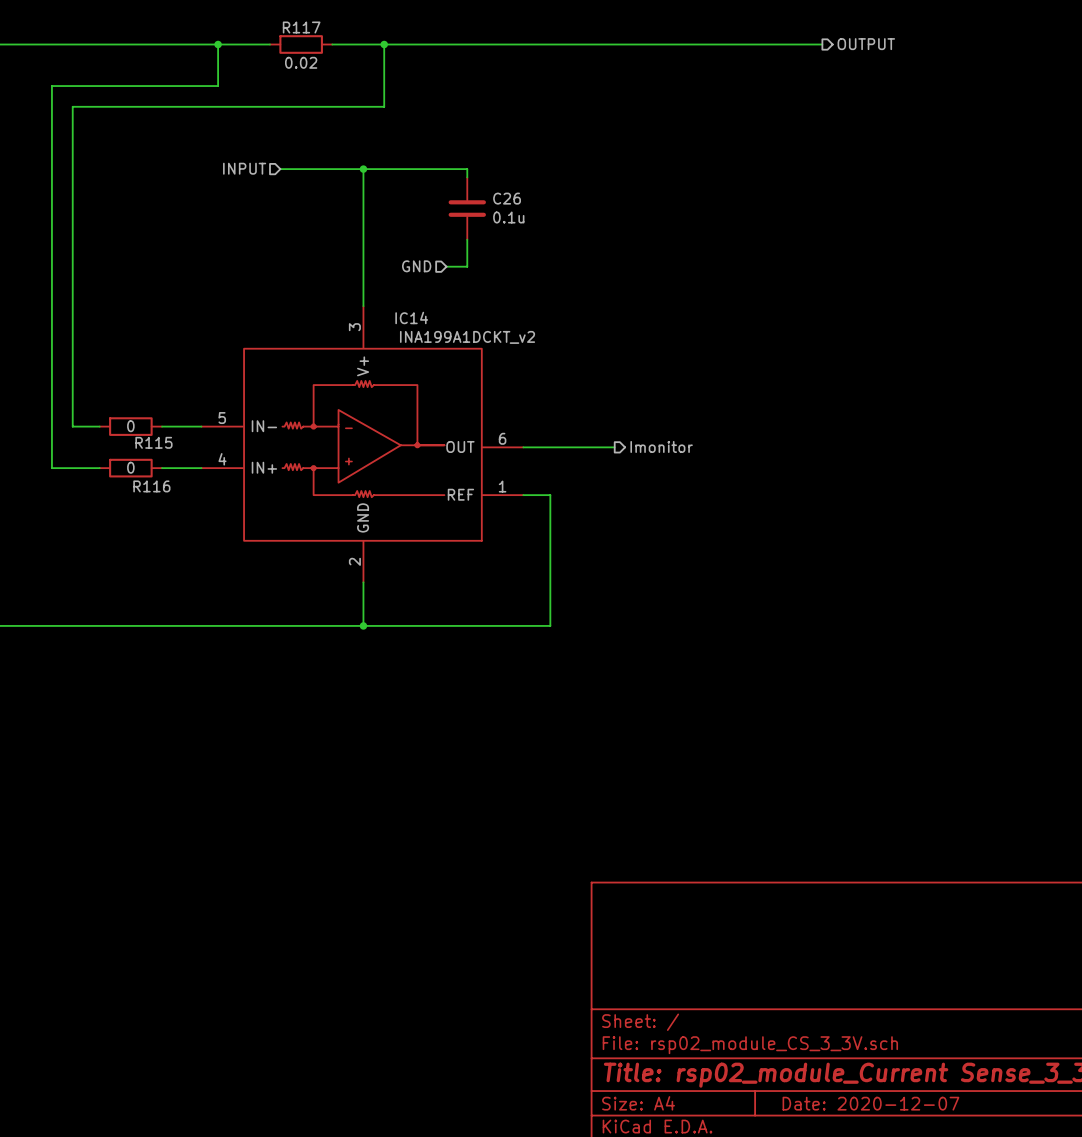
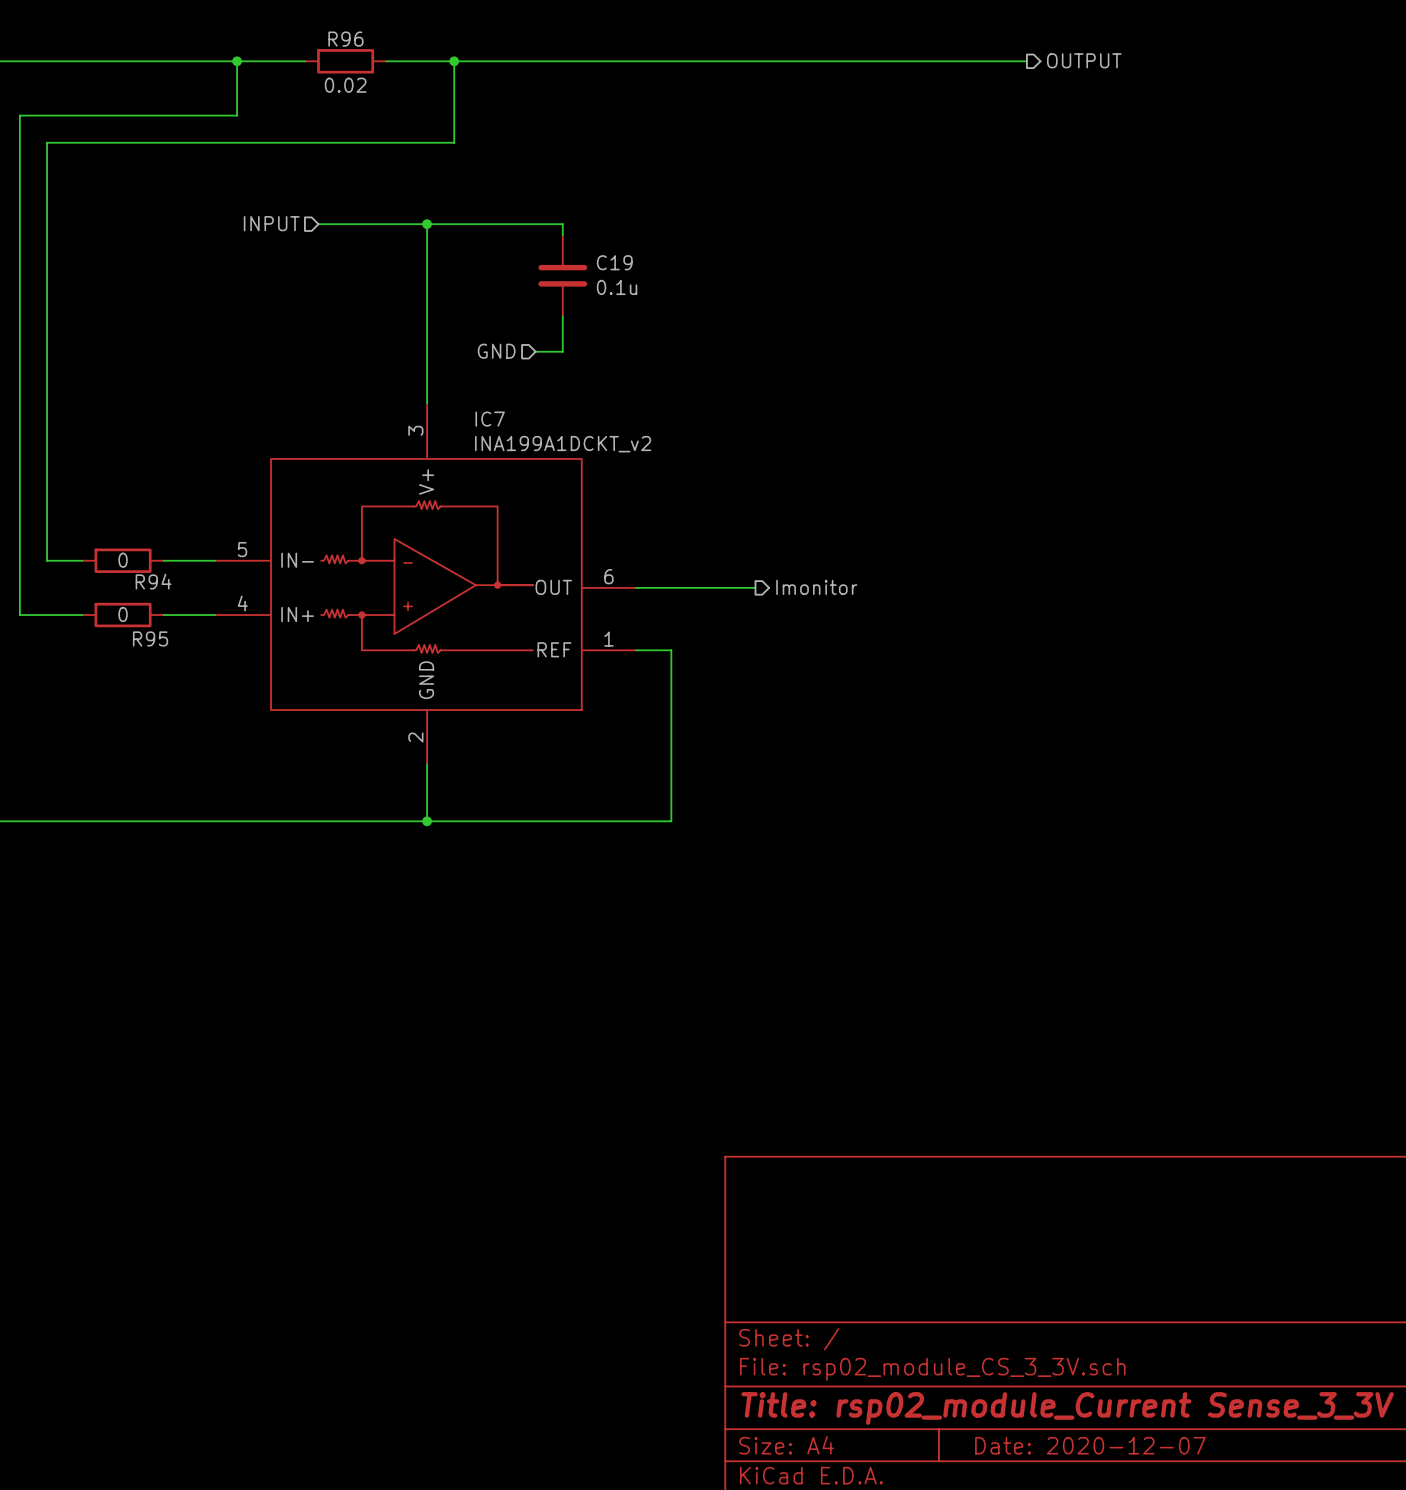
R117 name: R117 (301, 27) -> R96 (345, 39)
C26 name: C26 (507, 198) -> C19 (614, 262)
IC14 name: IC14 (411, 317) -> IC7 (490, 419)
R115 name: R115 (153, 442) -> R94 (153, 581)
R116 name: R116 (151, 486) -> R95 (150, 638)

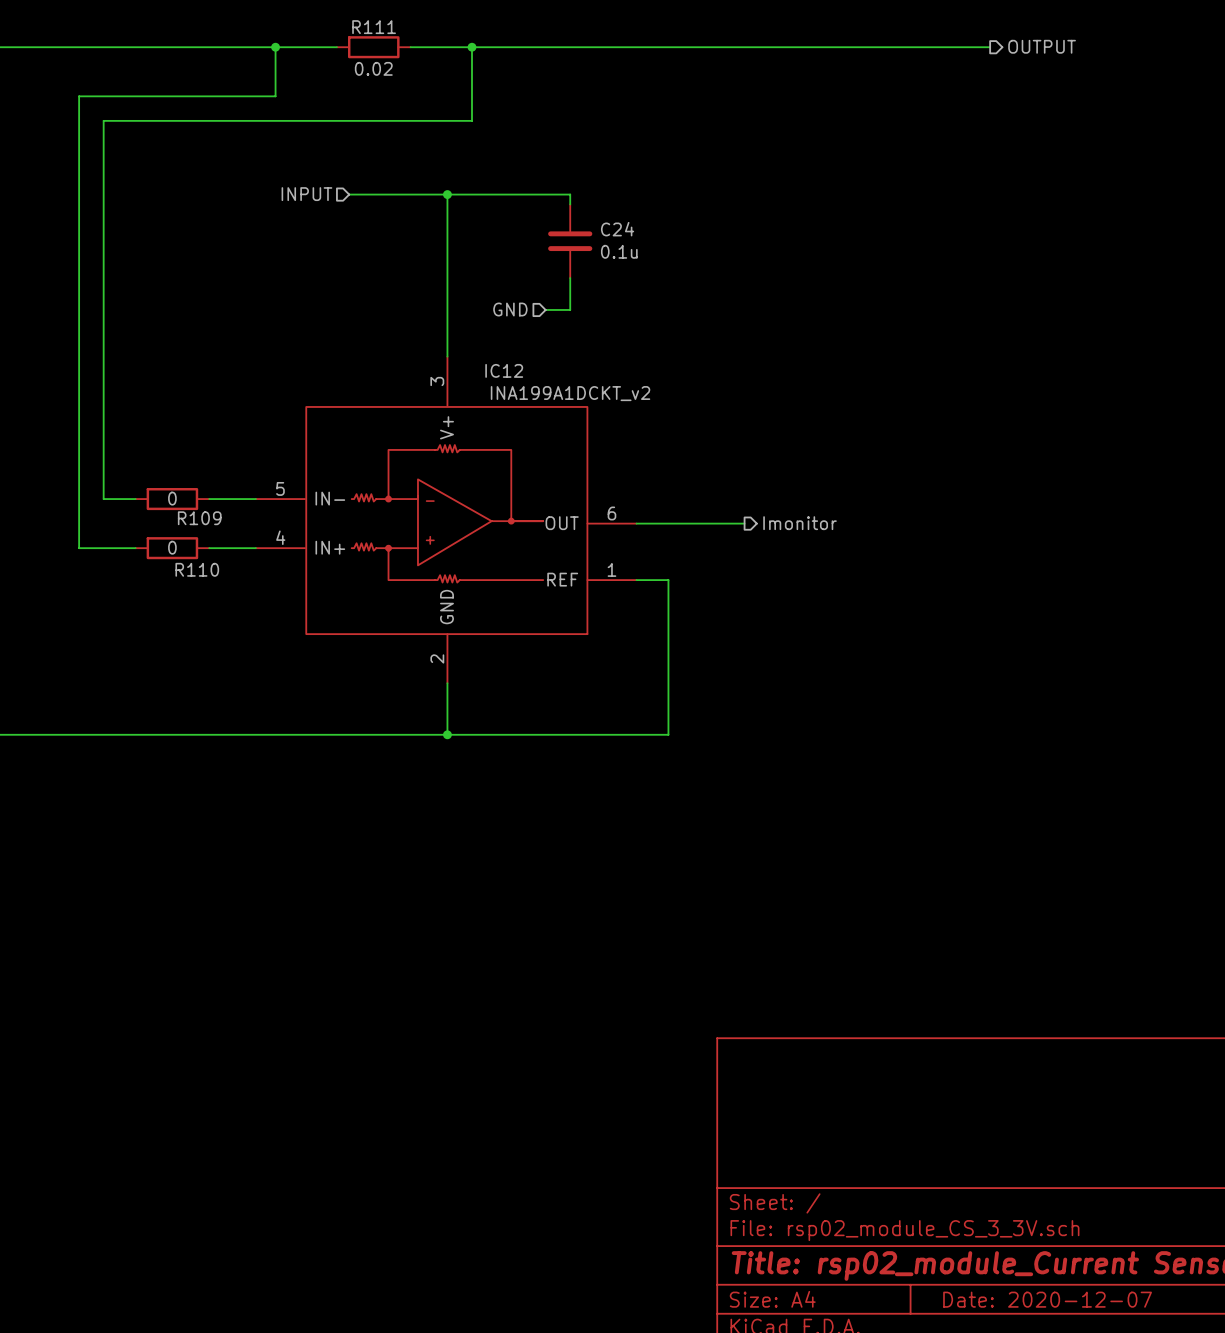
R96 name: R96 (345, 39) -> R111 (374, 27)
C19 name: C19 (614, 262) -> C24 (617, 229)
IC7 name: IC7 (490, 419) -> IC12 (504, 370)
R94 name: R94 (153, 581) -> R109 (199, 518)
R95 name: R95 (150, 638) -> R110 (197, 569)

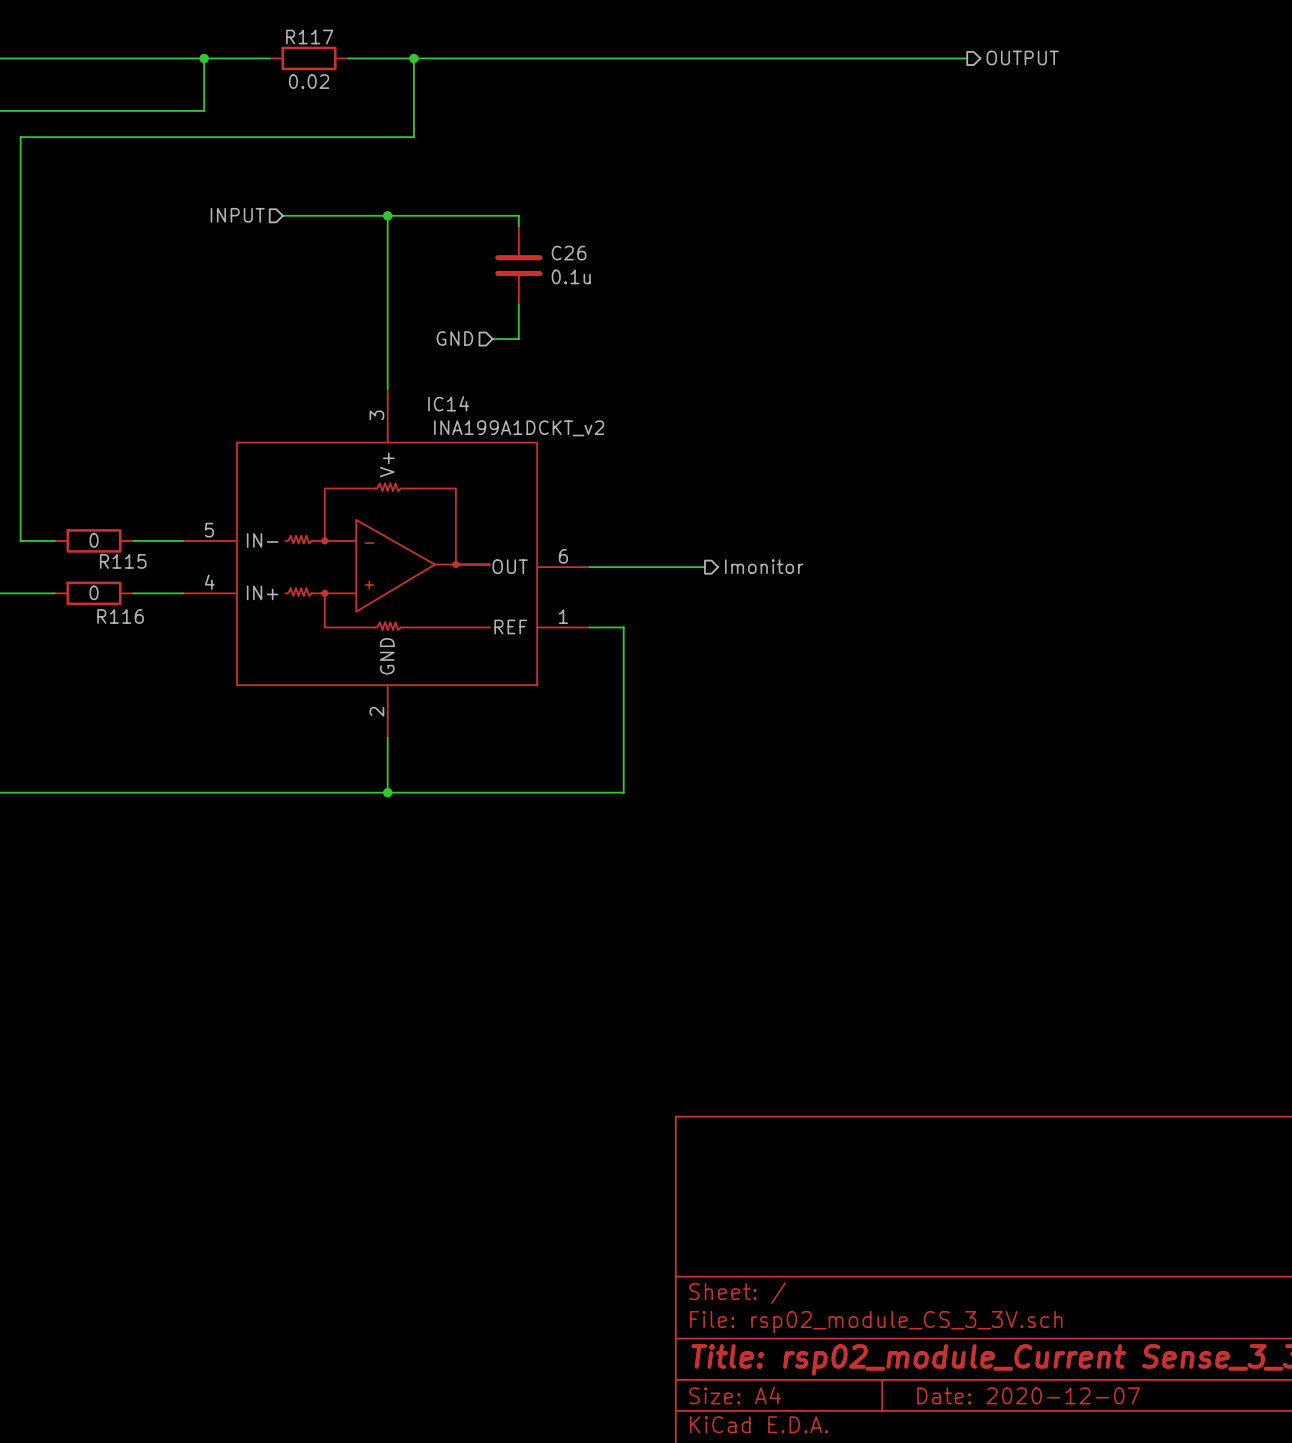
R111 name: R111 (374, 27) -> R117 (309, 37)
C24 name: C24 (617, 229) -> C26 (569, 253)
IC12 name: IC12 (504, 370) -> IC14 (448, 403)
R109 name: R109 (199, 518) -> R115 (123, 561)
R110 name: R110 (197, 569) -> R116 (120, 616)

